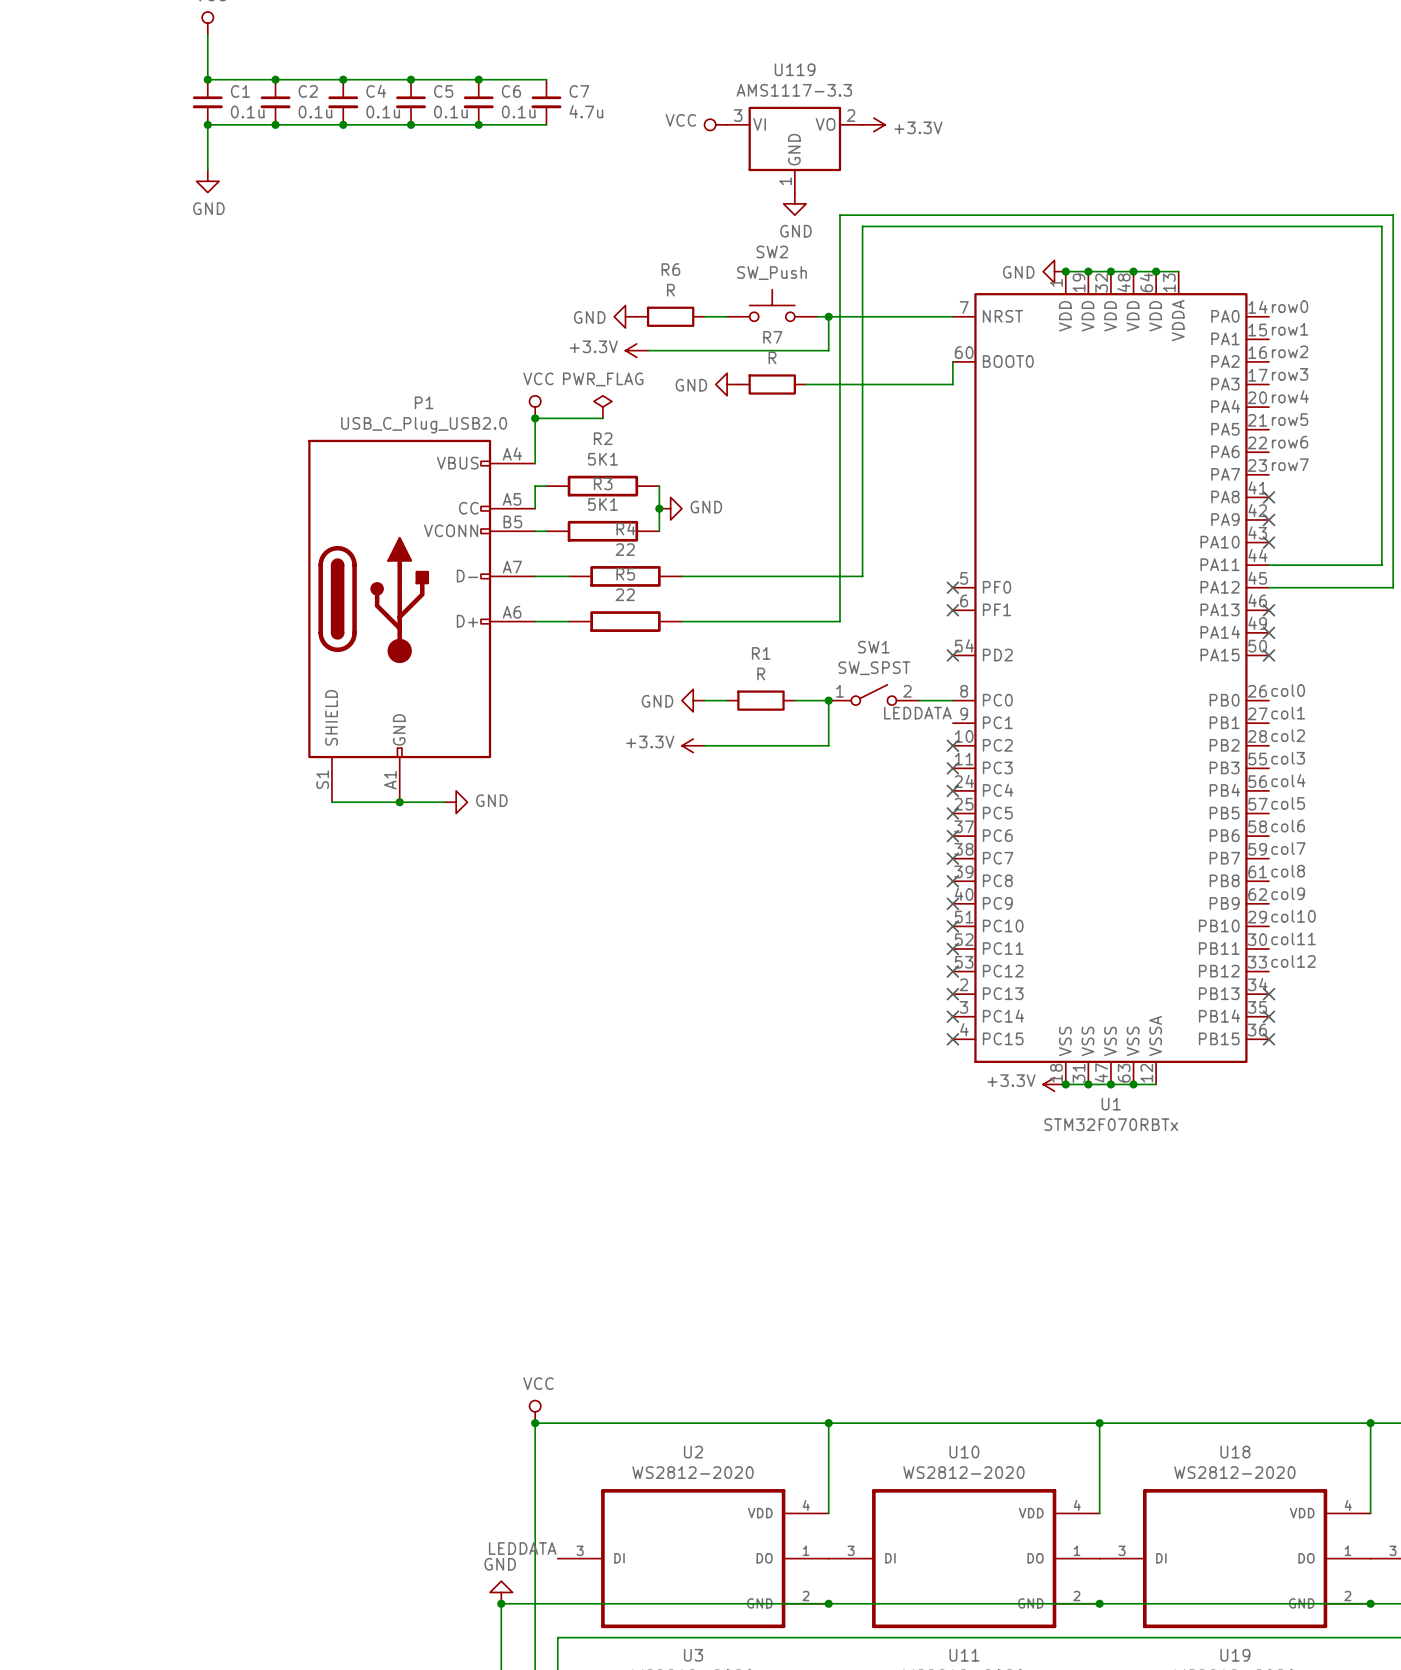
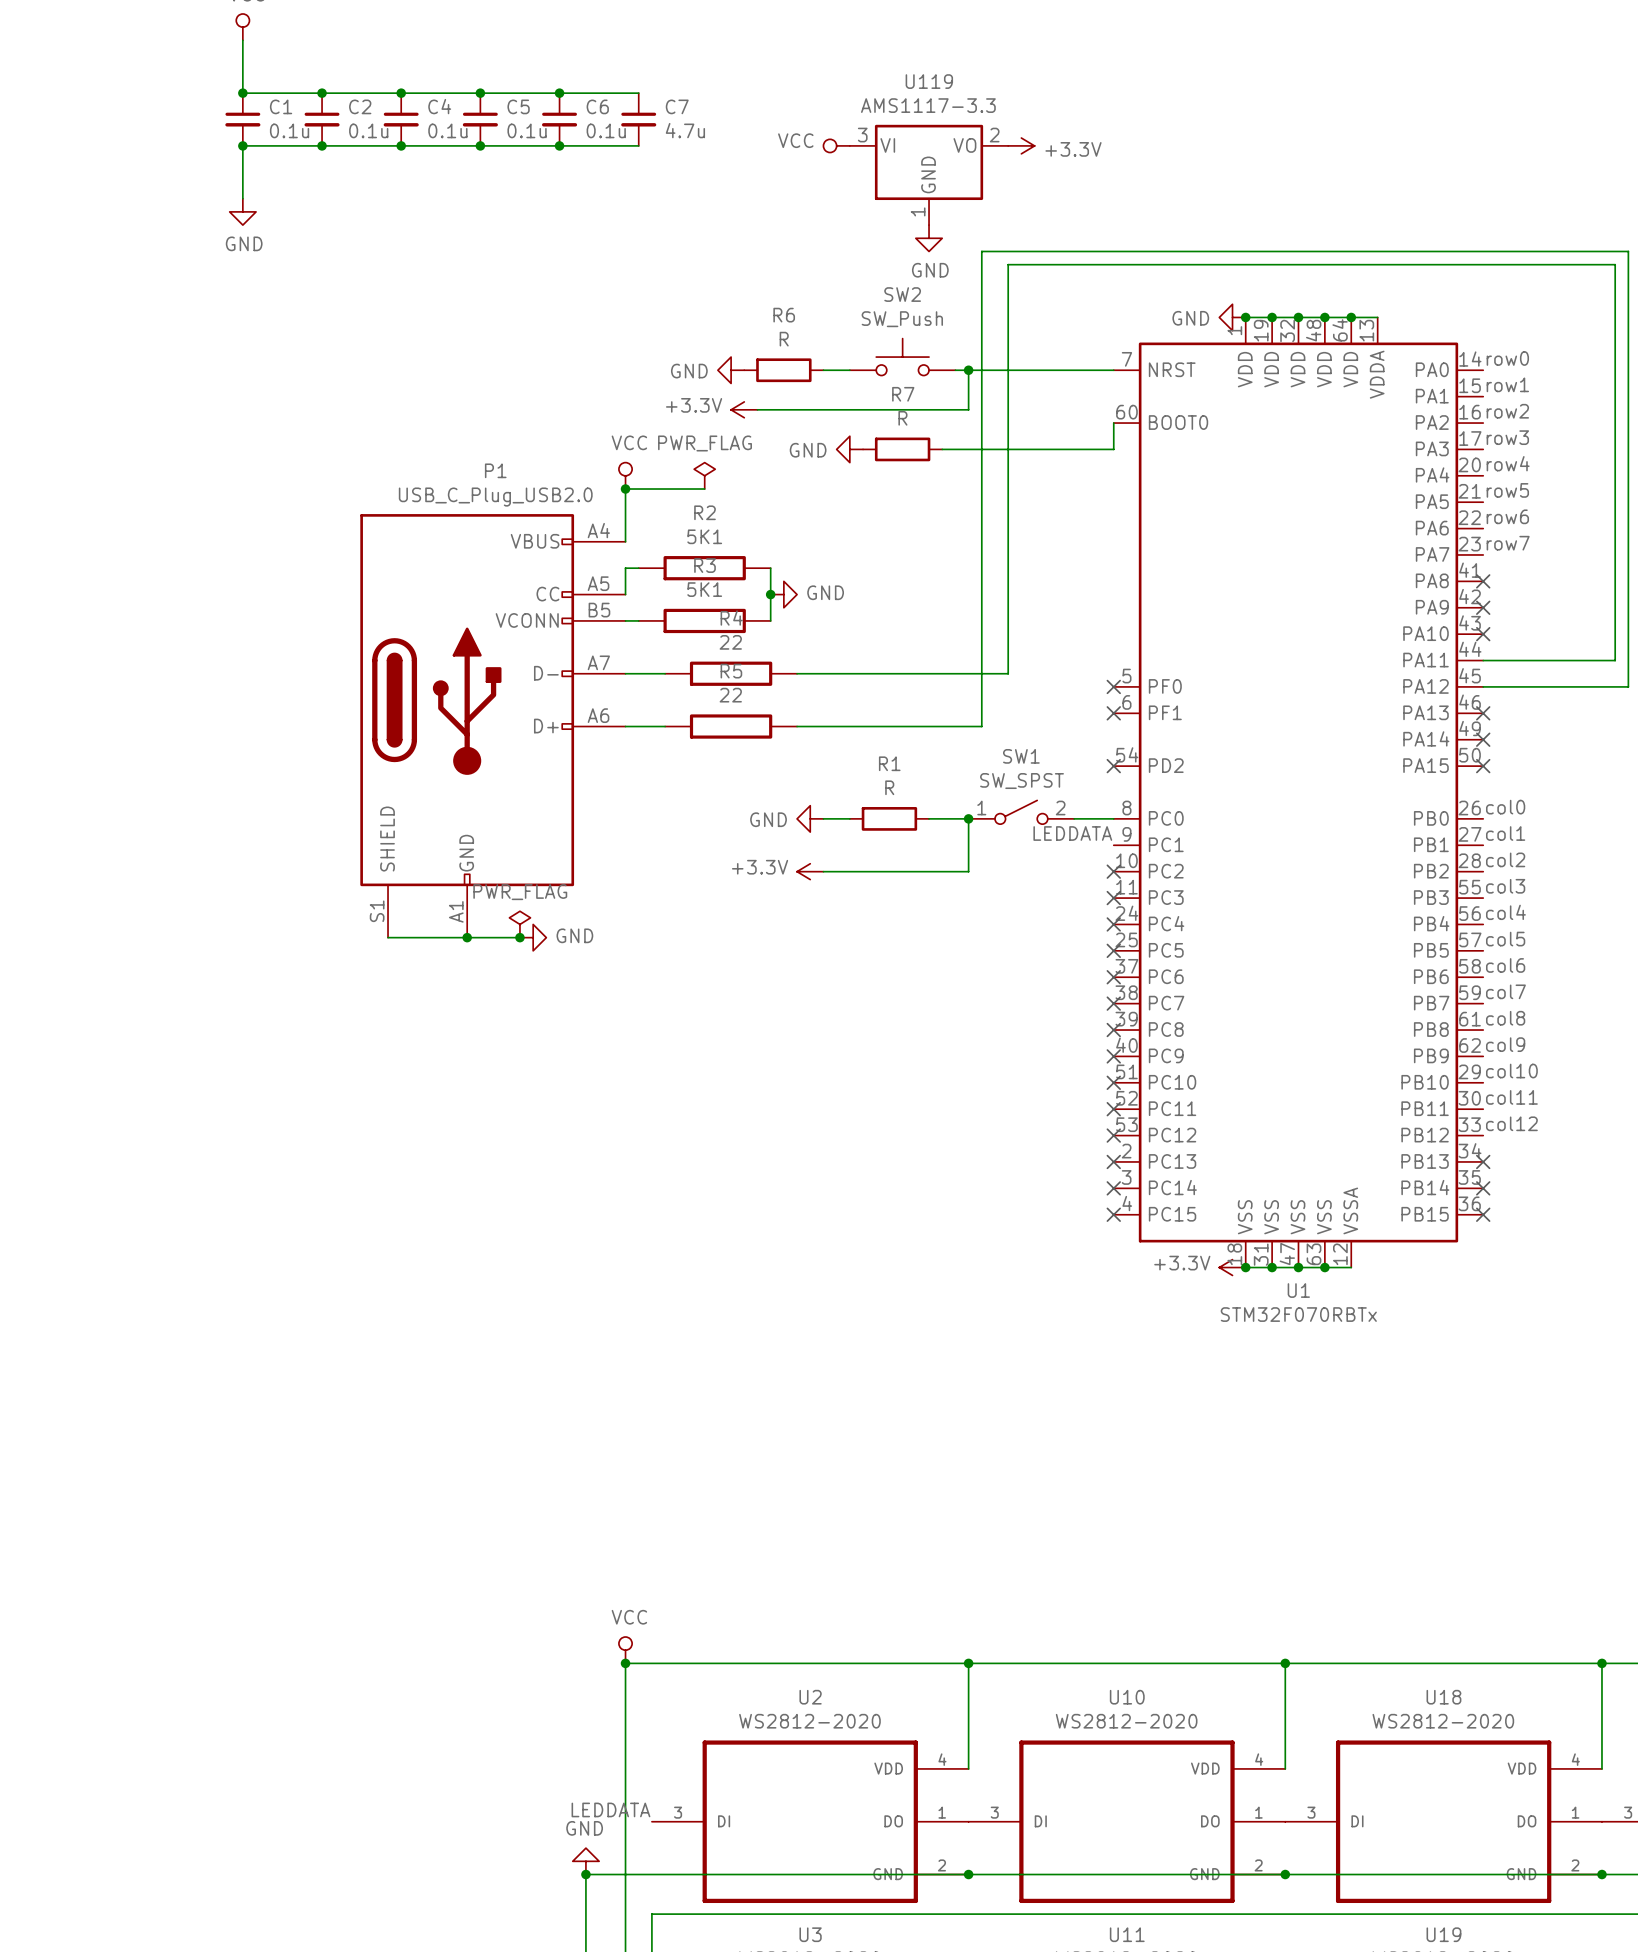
power symbol: none -> PWR_FLAG (519, 924)
junction: none -> (519, 937)

